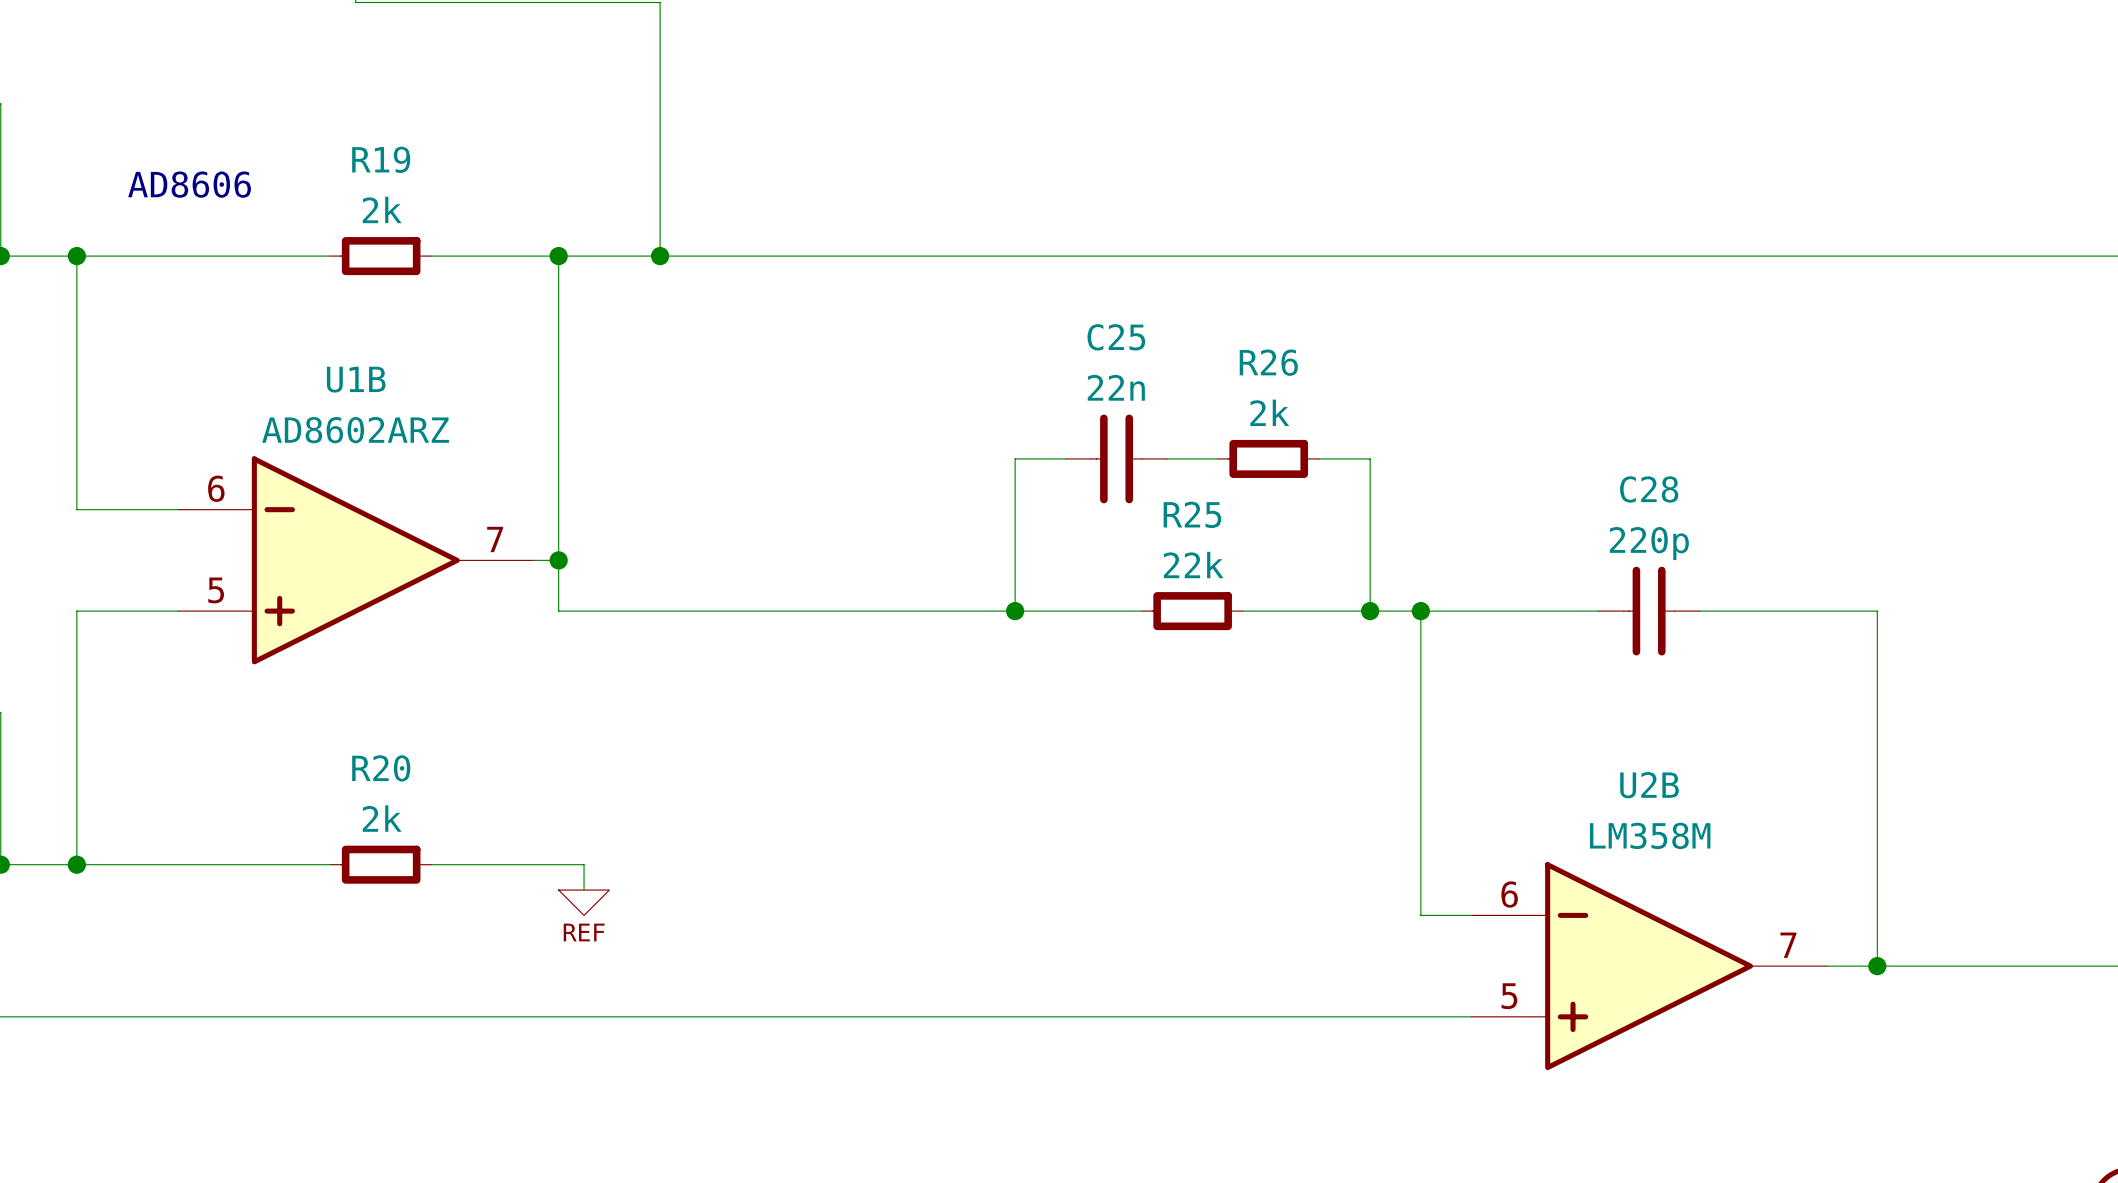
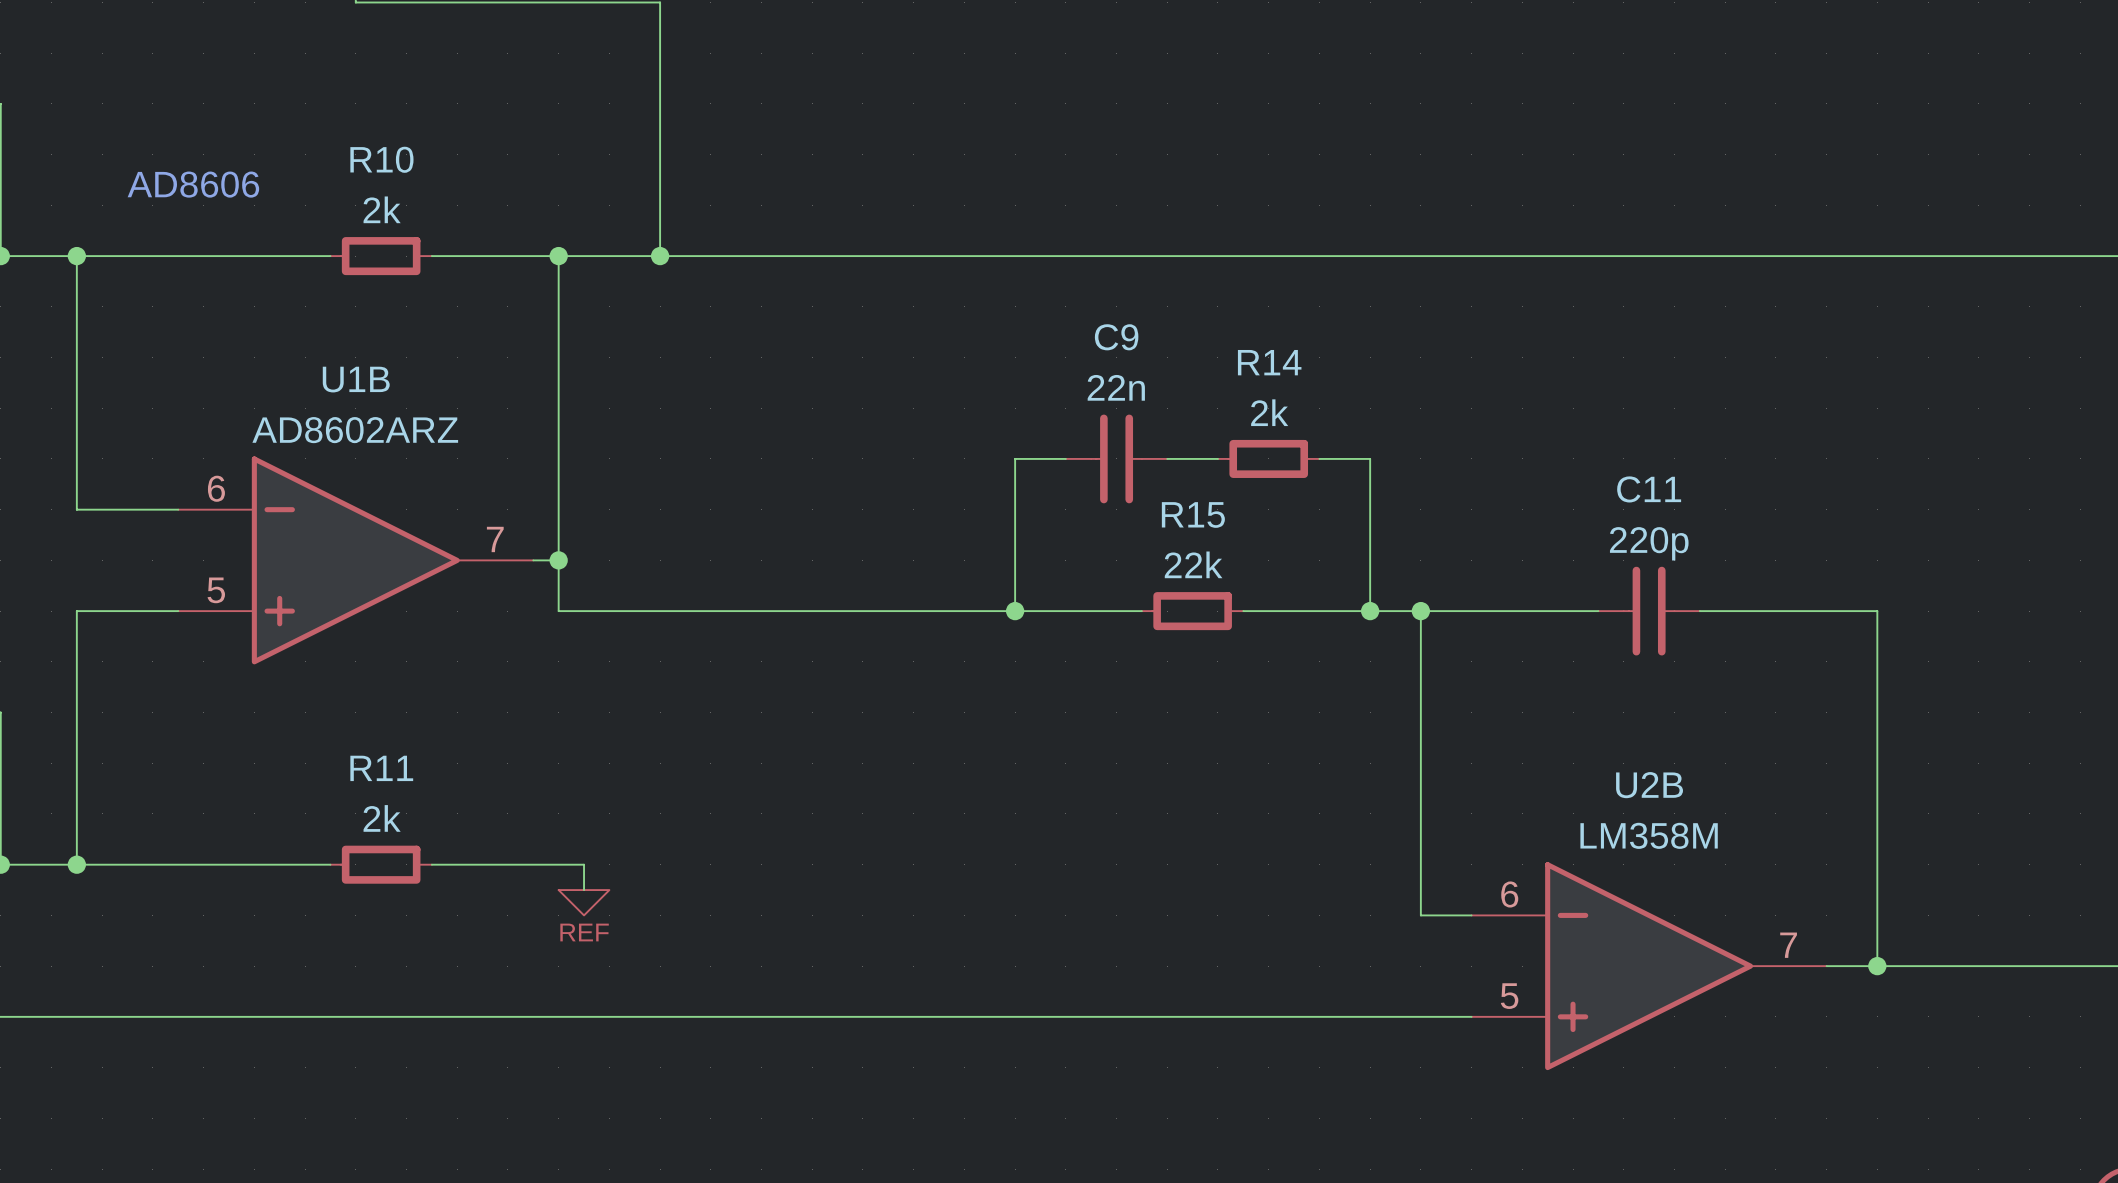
R19 name: R19 (381, 159) -> R10 (381, 159)
C25 name: C25 (1116, 337) -> C9 (1116, 337)
R26 name: R26 (1268, 362) -> R14 (1269, 362)
C28 name: C28 (1649, 489) -> C11 (1649, 489)
R25 name: R25 (1192, 514) -> R15 (1193, 514)
R20 name: R20 (381, 768) -> R11 (381, 768)

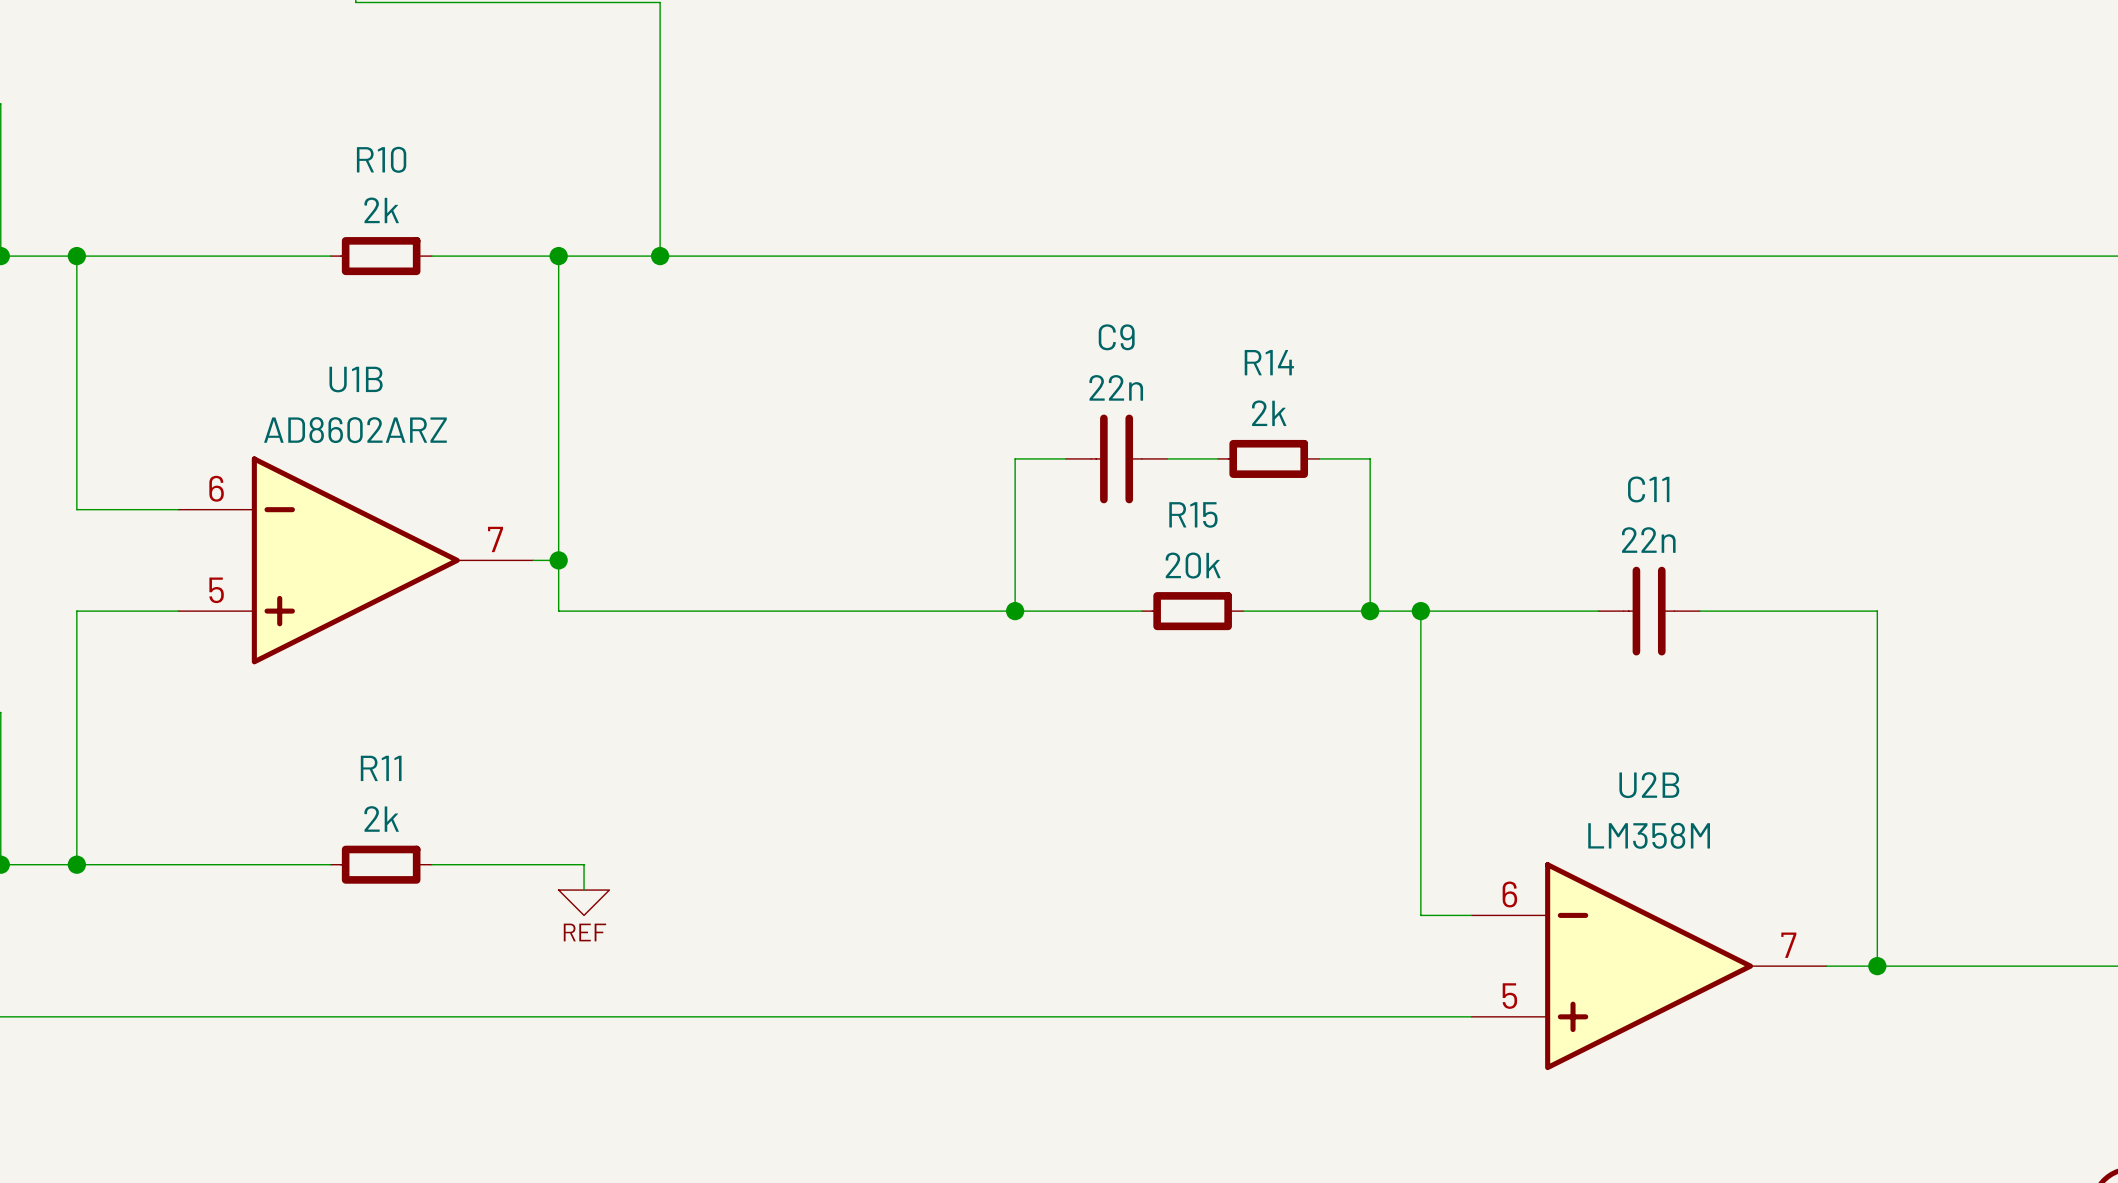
text: AD8606 (193, 184) -> none
C11 value: 220p (1649, 543) -> 22n (1648, 540)
R15 value: 22k (1193, 564) -> 20k (1193, 565)

